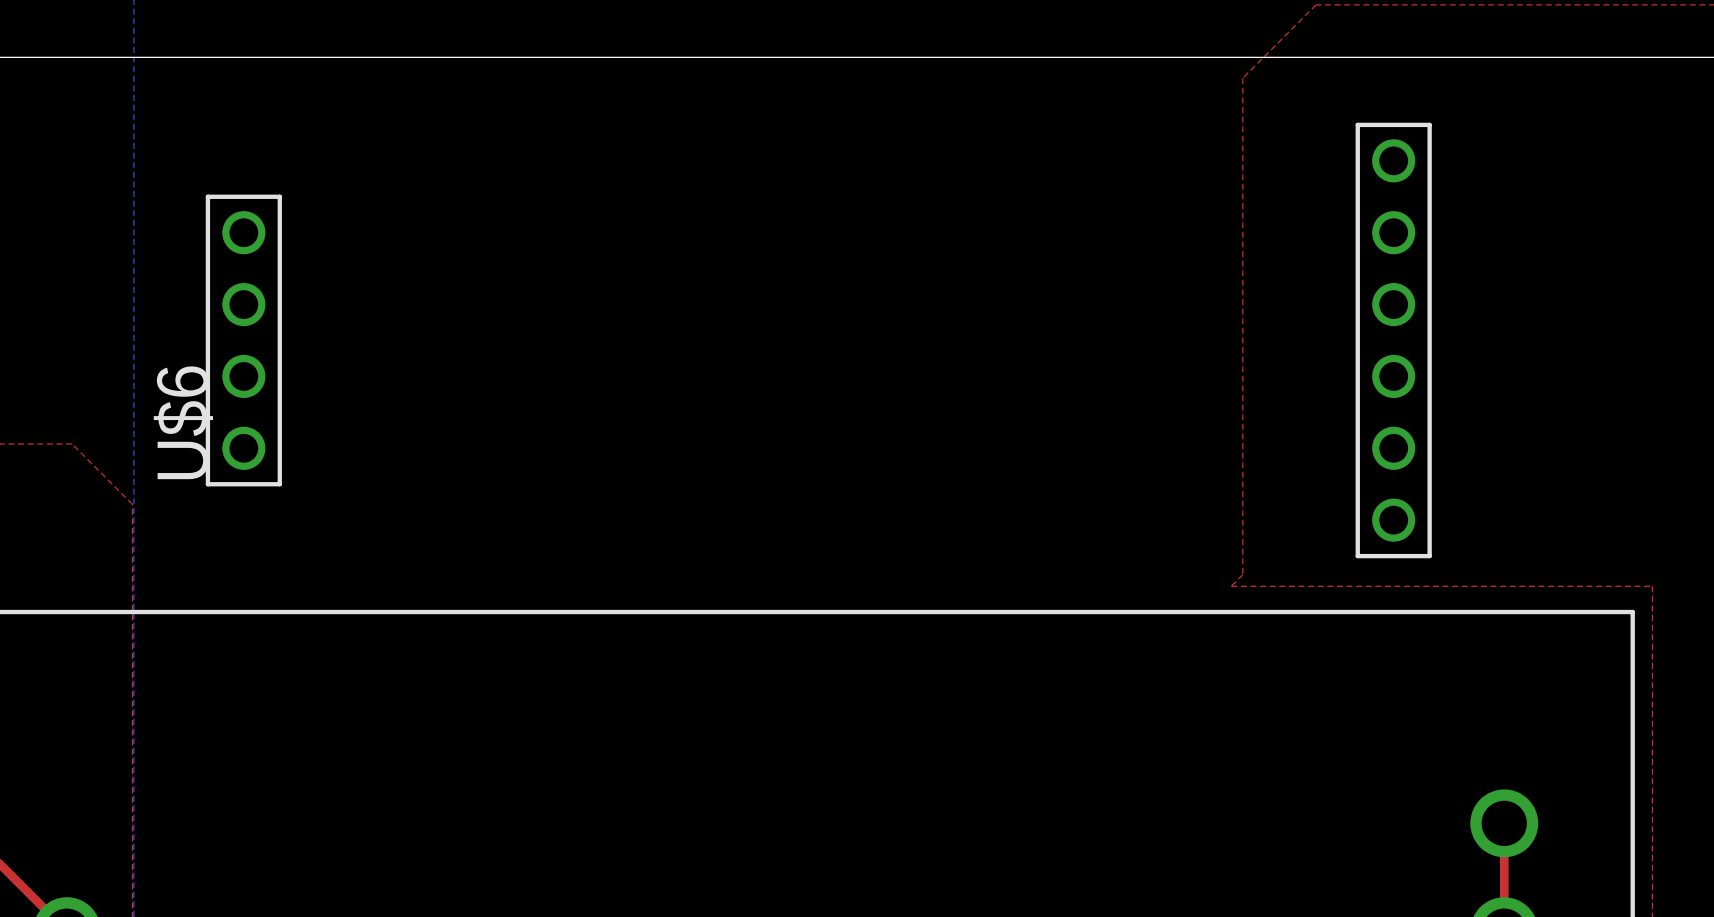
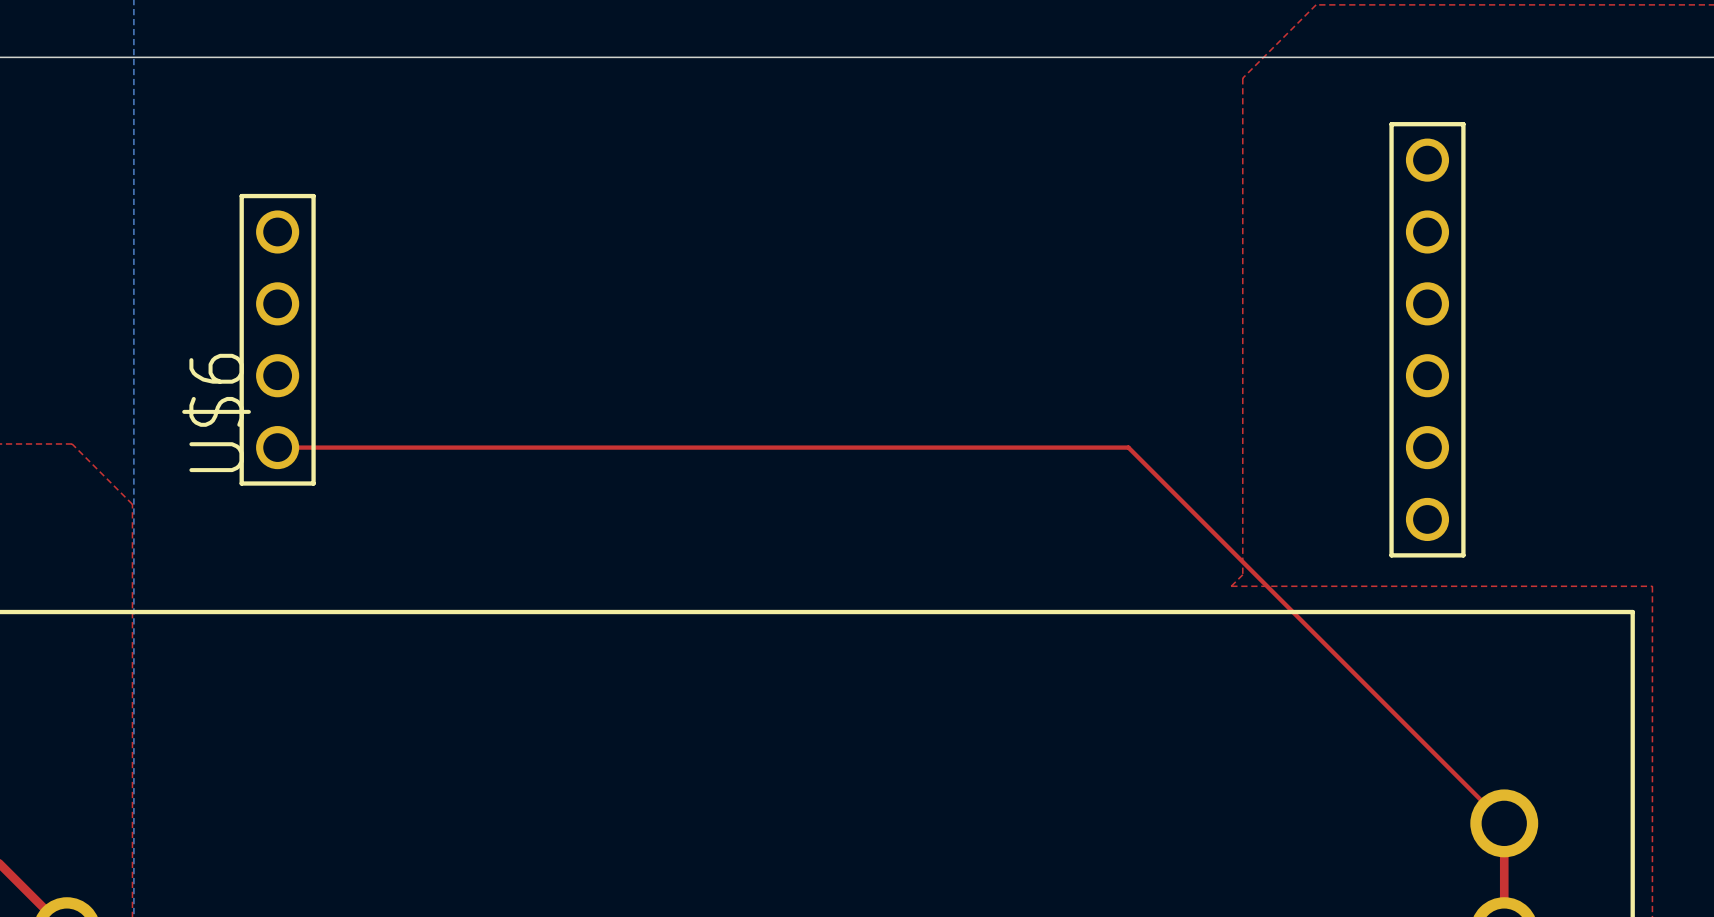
U$6 position: (818, 340) -> (852, 339)
top track: none -> (277, 447) (1128, 447) (1504, 823)

